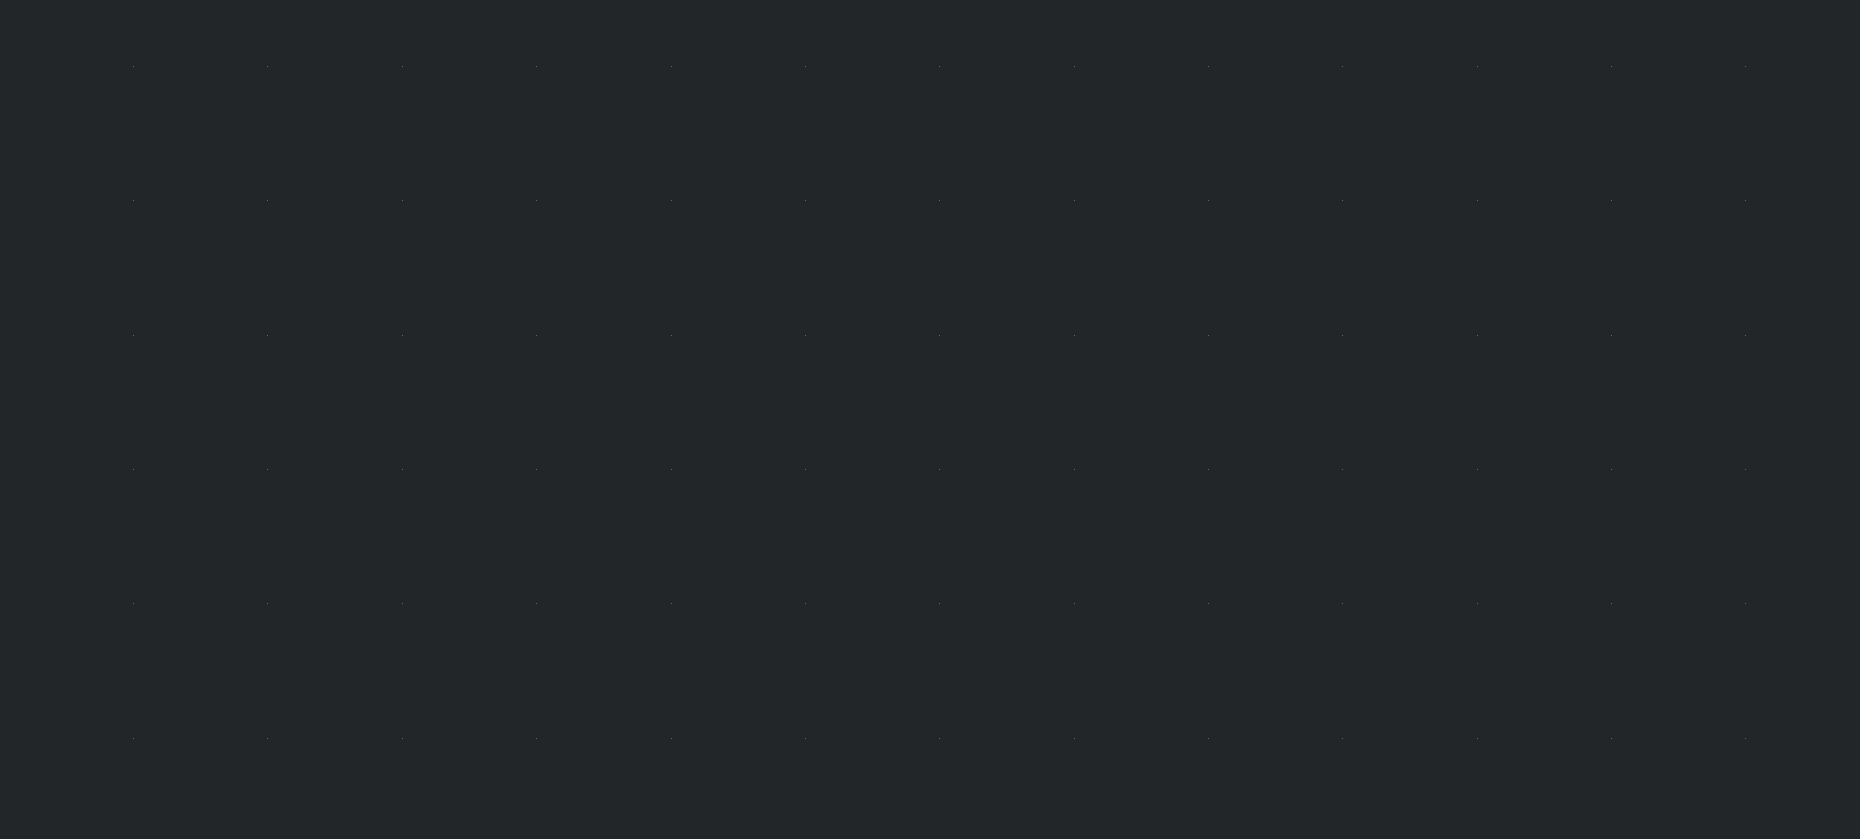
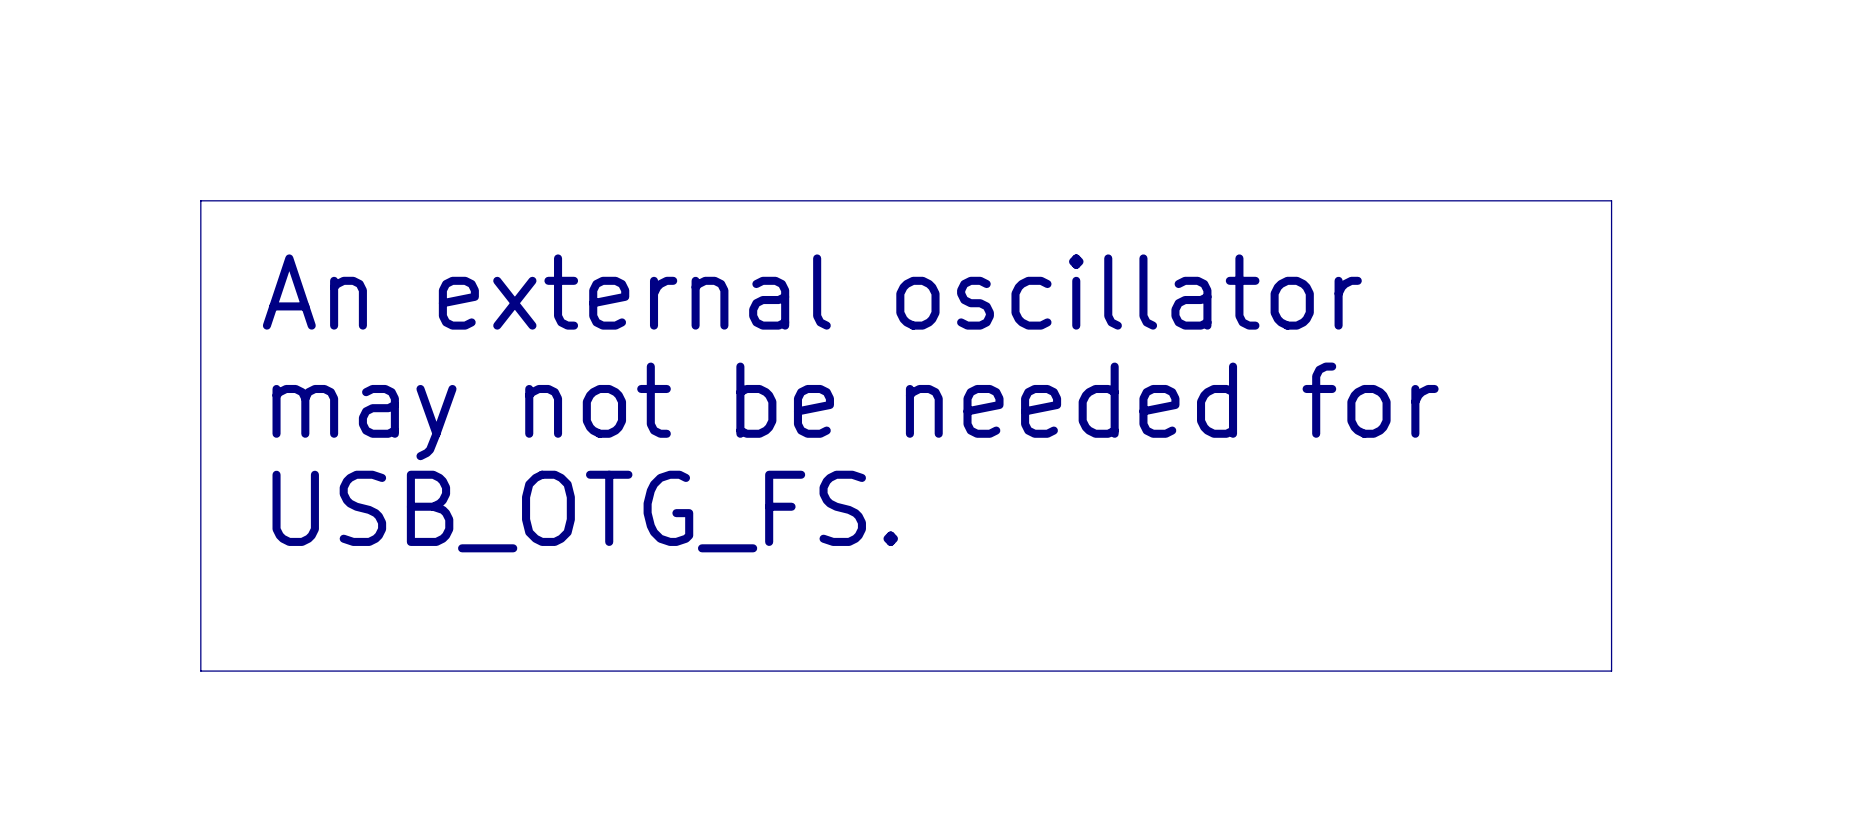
line: none -> (200, 200) (1611, 200) (1611, 671) (200, 671) (200, 200)
text: none -> An external oscillator (812, 292)
text: none -> may not be needed for (855, 411)
text: none -> USB_OTG_FS. (585, 511)

